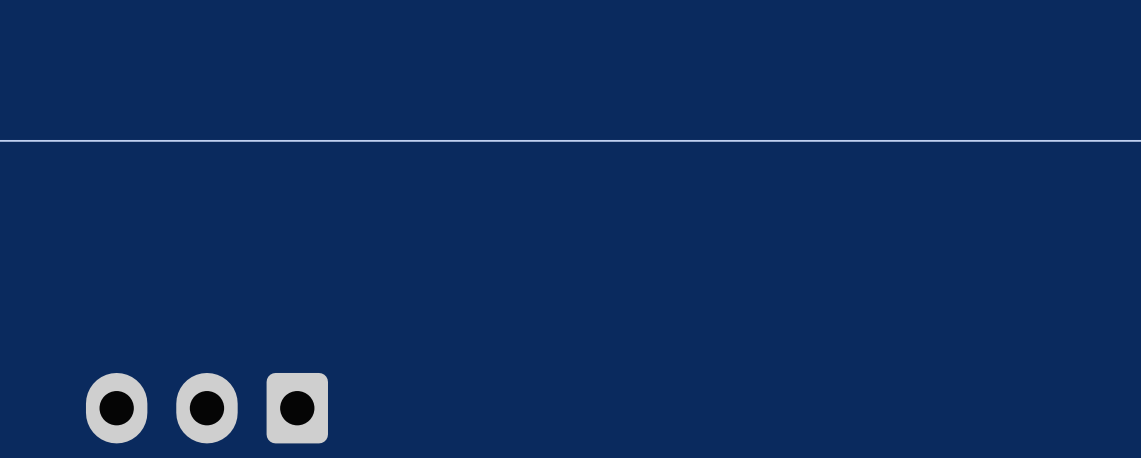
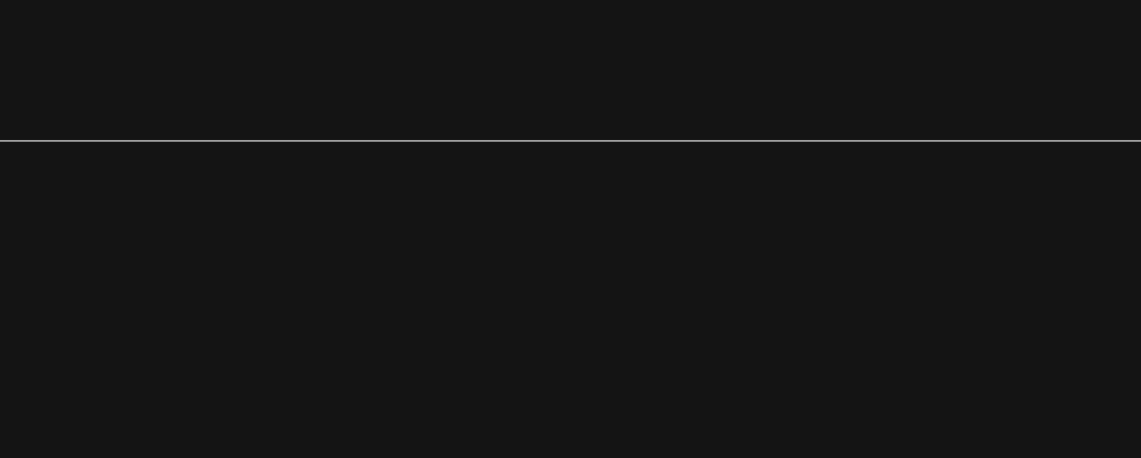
part: (206, 408) -> none

